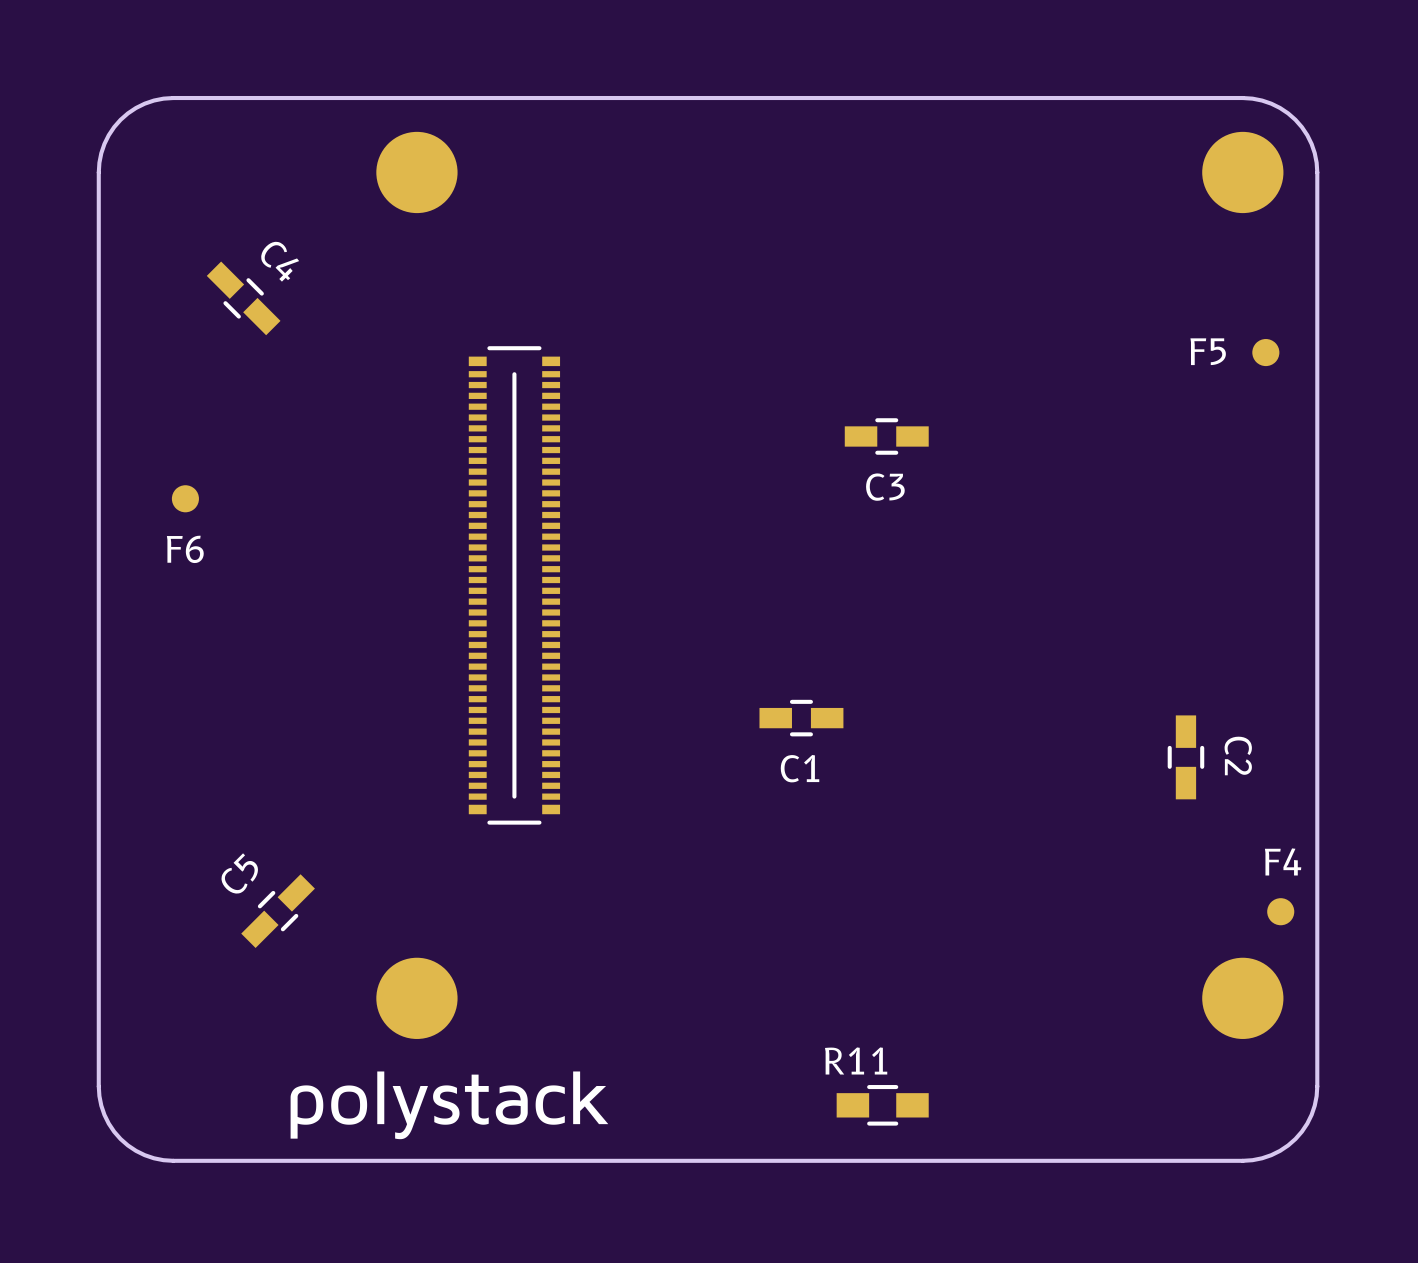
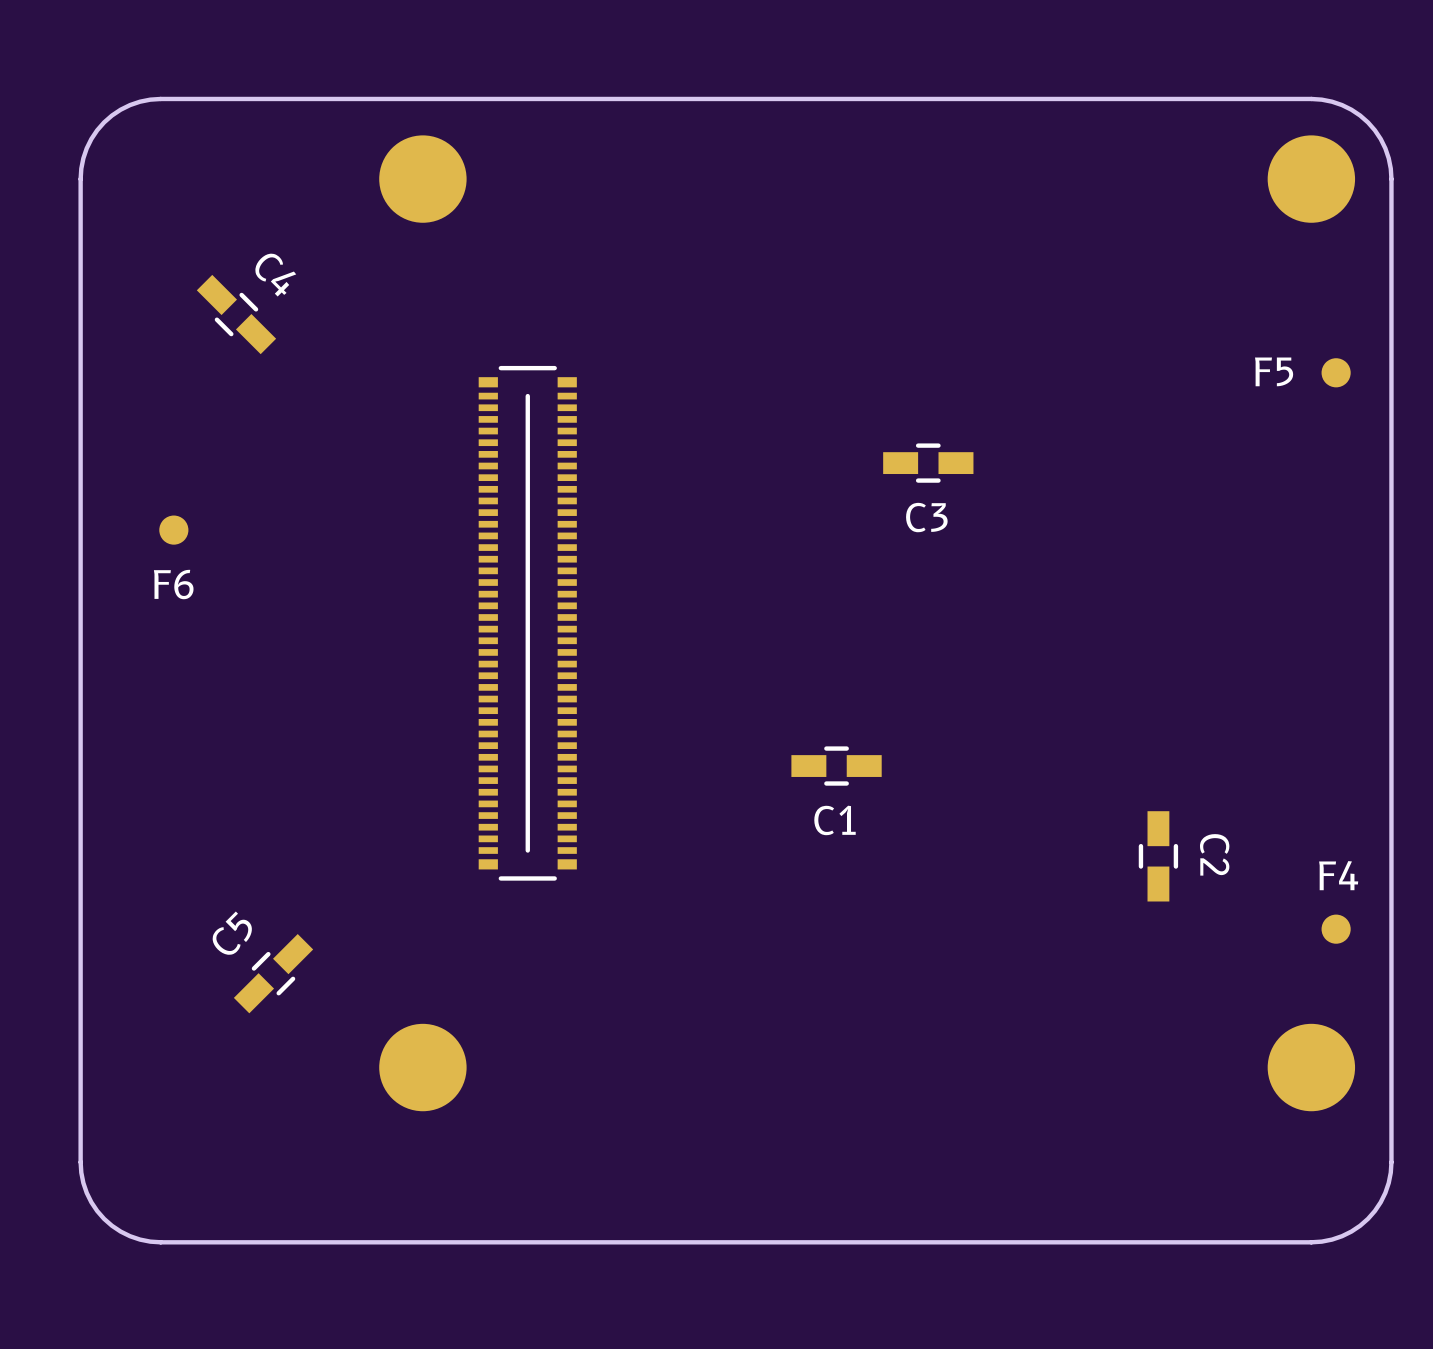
C2 position: (1185, 757) -> (1158, 856)
F4 position: (1280, 911) -> (1336, 929)
drawing: [290, 1071, 609, 1140] -> none
R11: (882, 1105) -> none

